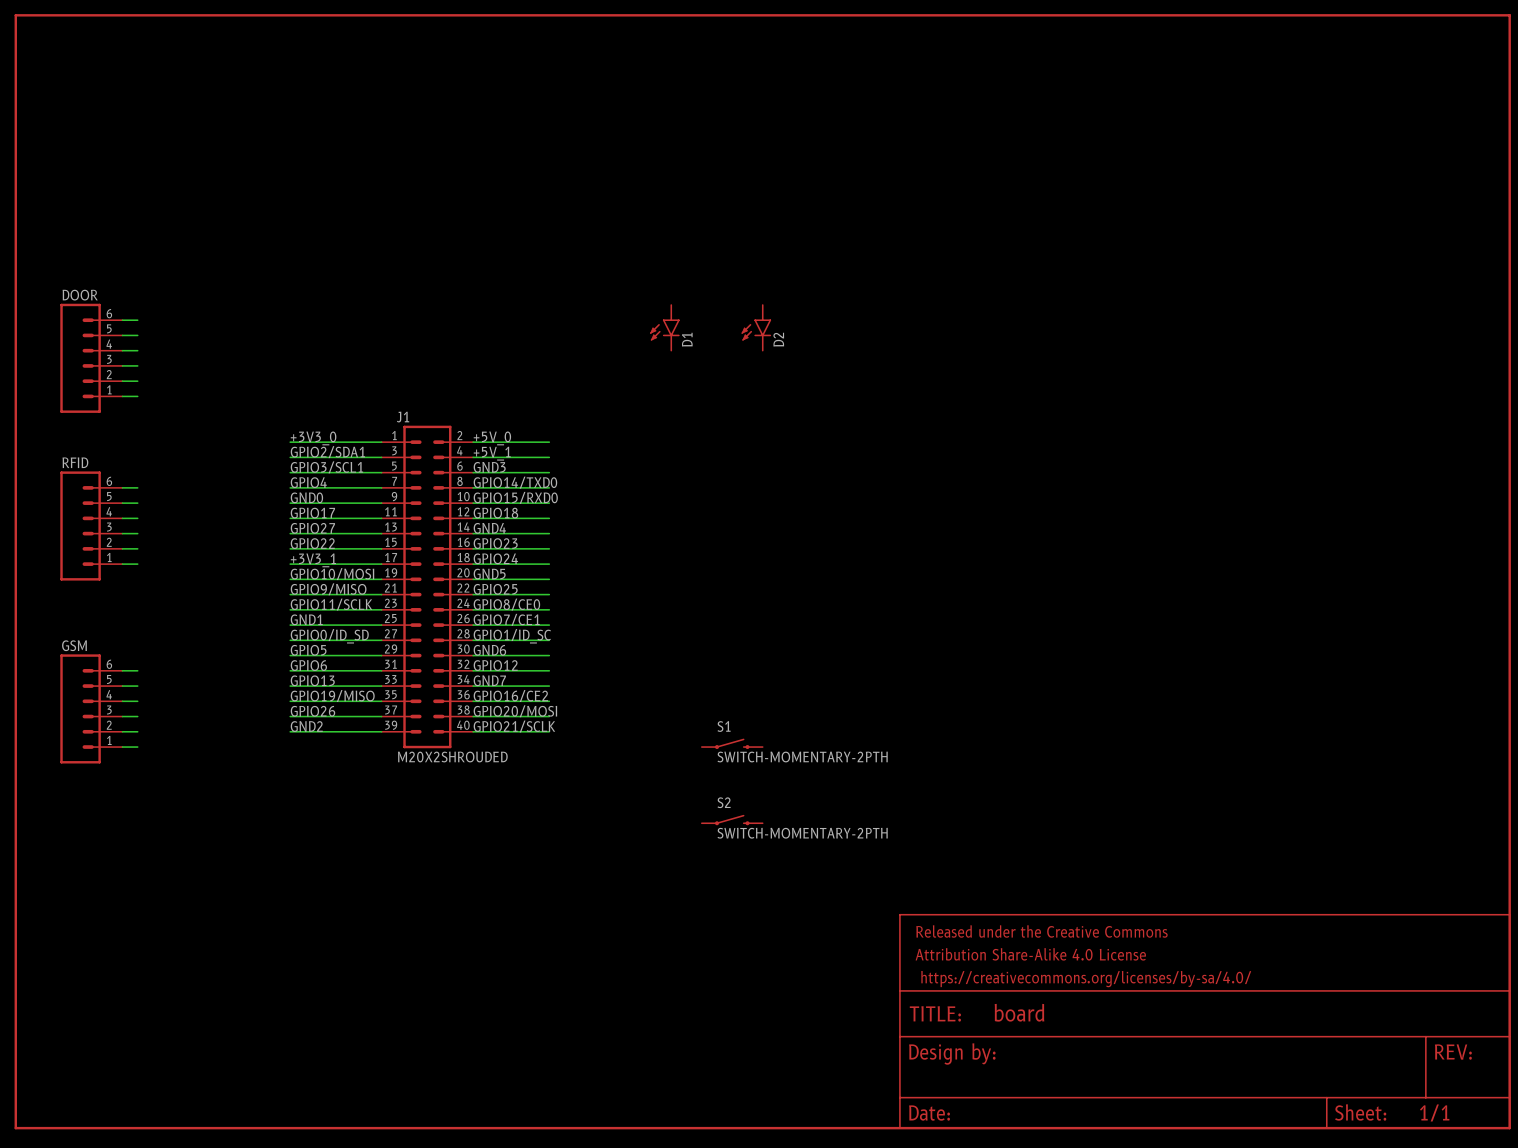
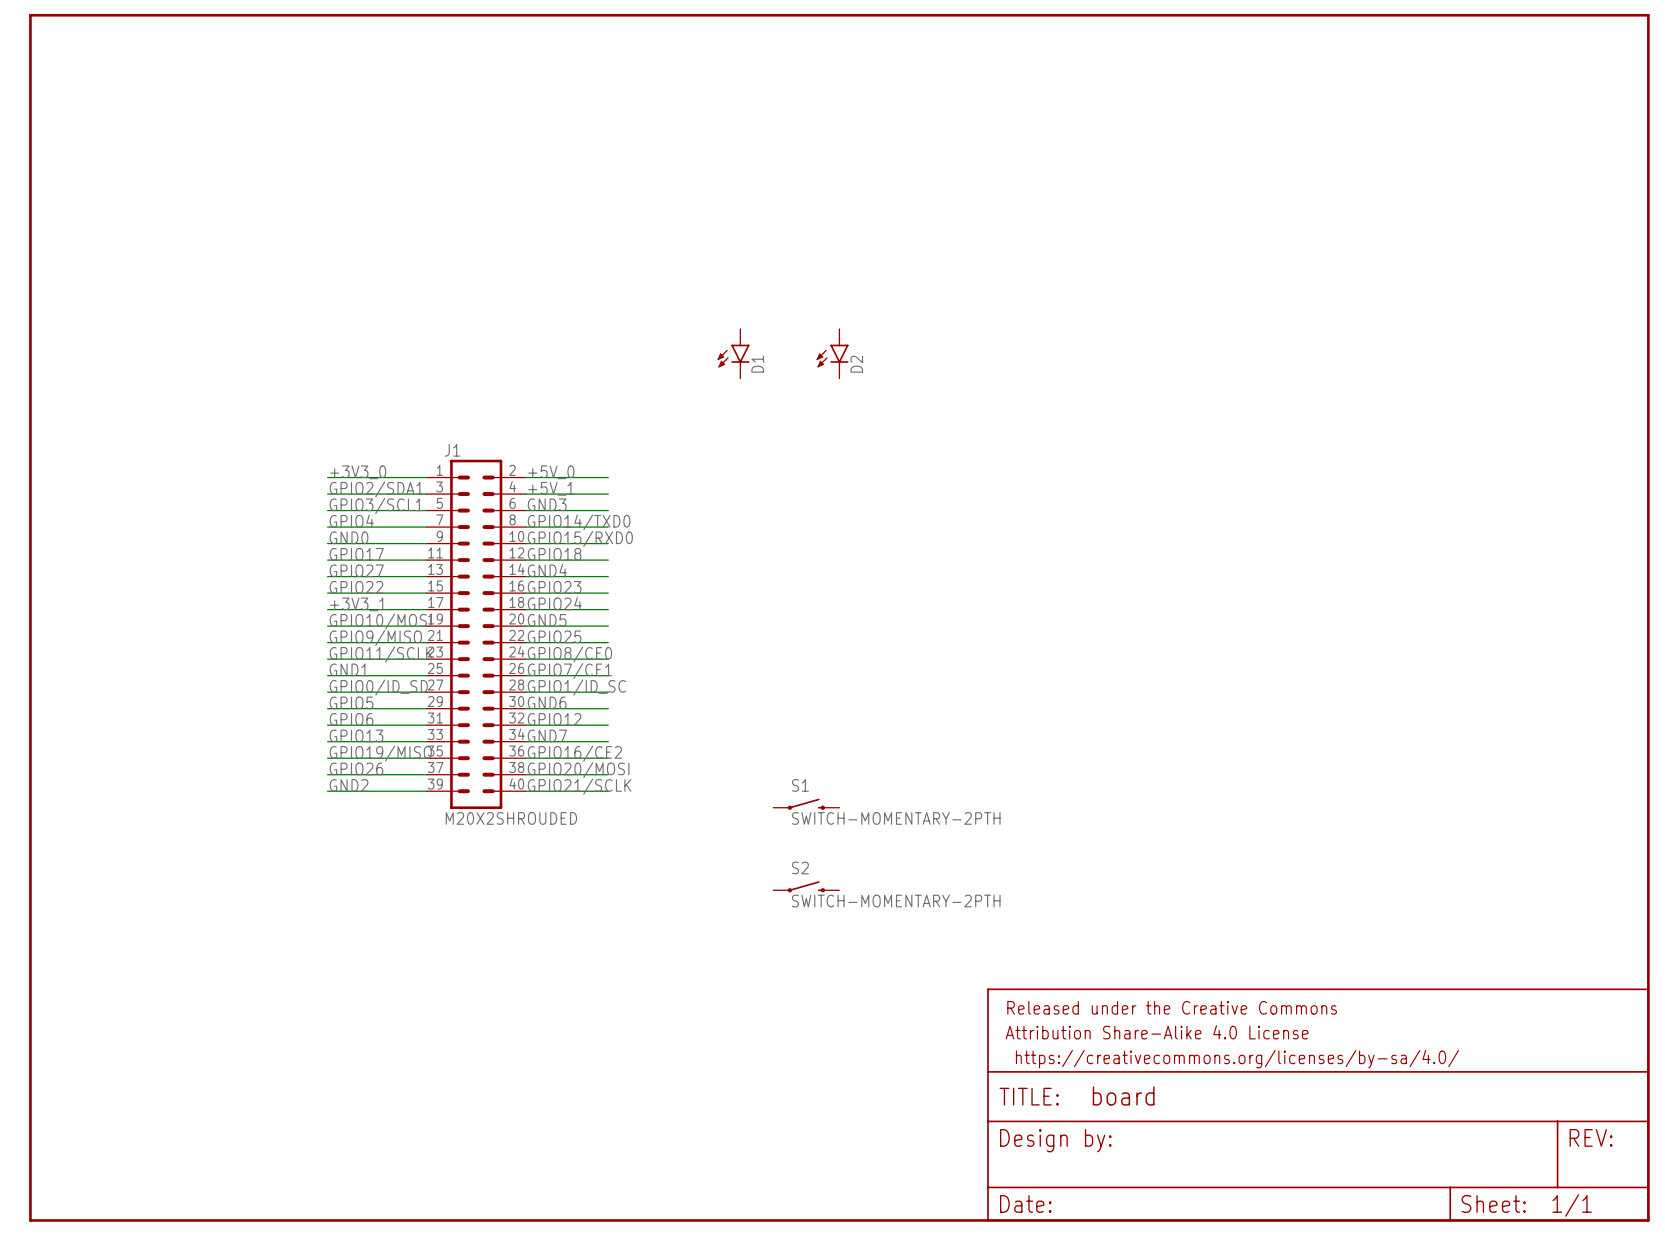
wire: (122, 320) (137, 320) -> none
wire: (122, 335) (137, 335) -> none
wire: (122, 350) (137, 350) -> none
DOOR: (91, 358) -> none
wire: (122, 365) (137, 365) -> none
wire: (122, 381) (137, 381) -> none
wire: (122, 396) (137, 396) -> none
wire: (122, 487) (137, 487) -> none
wire: (122, 503) (137, 503) -> none
wire: (122, 518) (137, 518) -> none
RFID: (91, 525) -> none
wire: (122, 533) (137, 533) -> none
wire: (122, 548) (137, 548) -> none
wire: (122, 564) (137, 564) -> none
wire: (122, 670) (137, 670) -> none
wire: (122, 686) (137, 686) -> none
wire: (122, 701) (137, 701) -> none
GSM: (91, 708) -> none
wire: (122, 716) (137, 716) -> none
wire: (122, 731) (137, 731) -> none
wire: (122, 747) (137, 747) -> none

